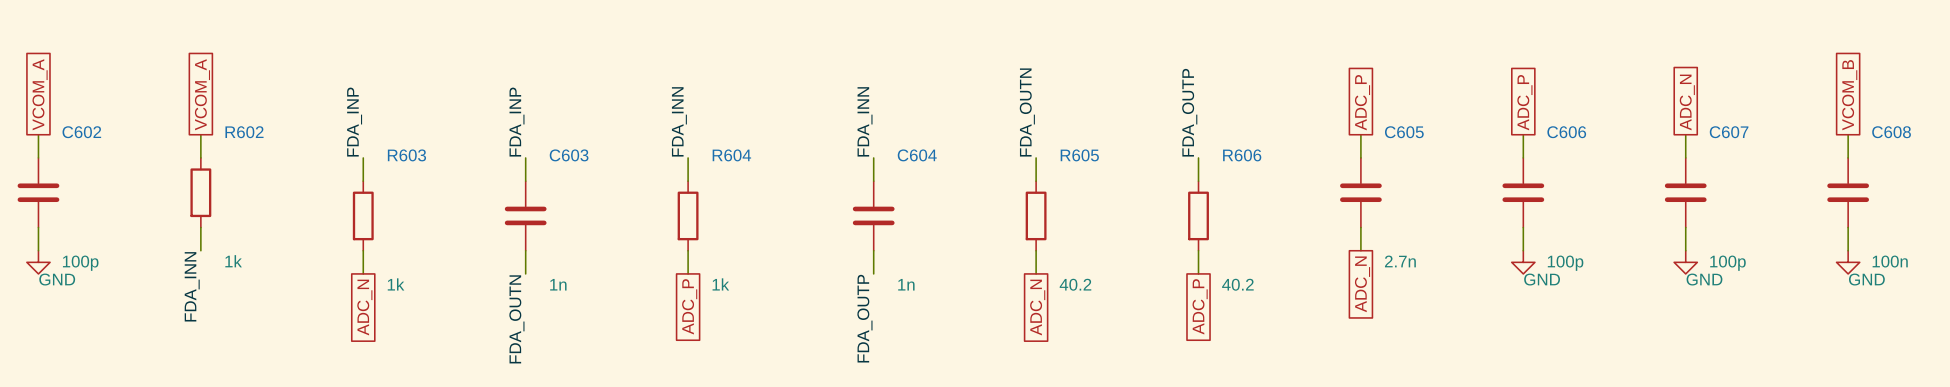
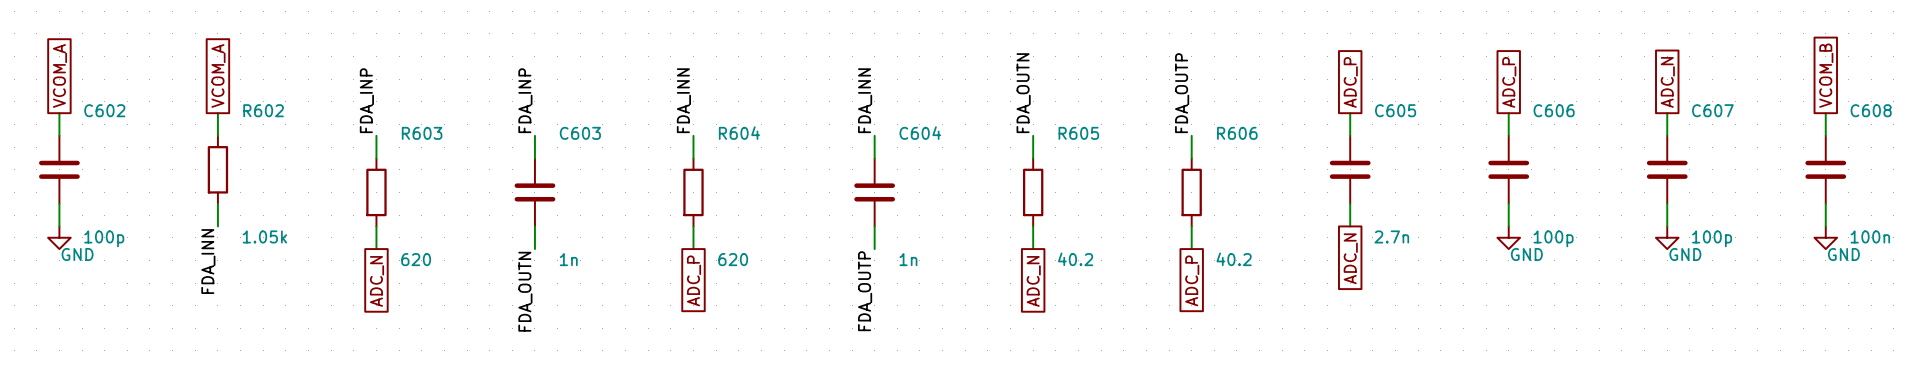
R602 value: 1k (233, 261) -> 1.05k (264, 236)
R603 value: 1k (396, 284) -> 620 (416, 259)
R604 value: 1k (720, 284) -> 620 (733, 259)

